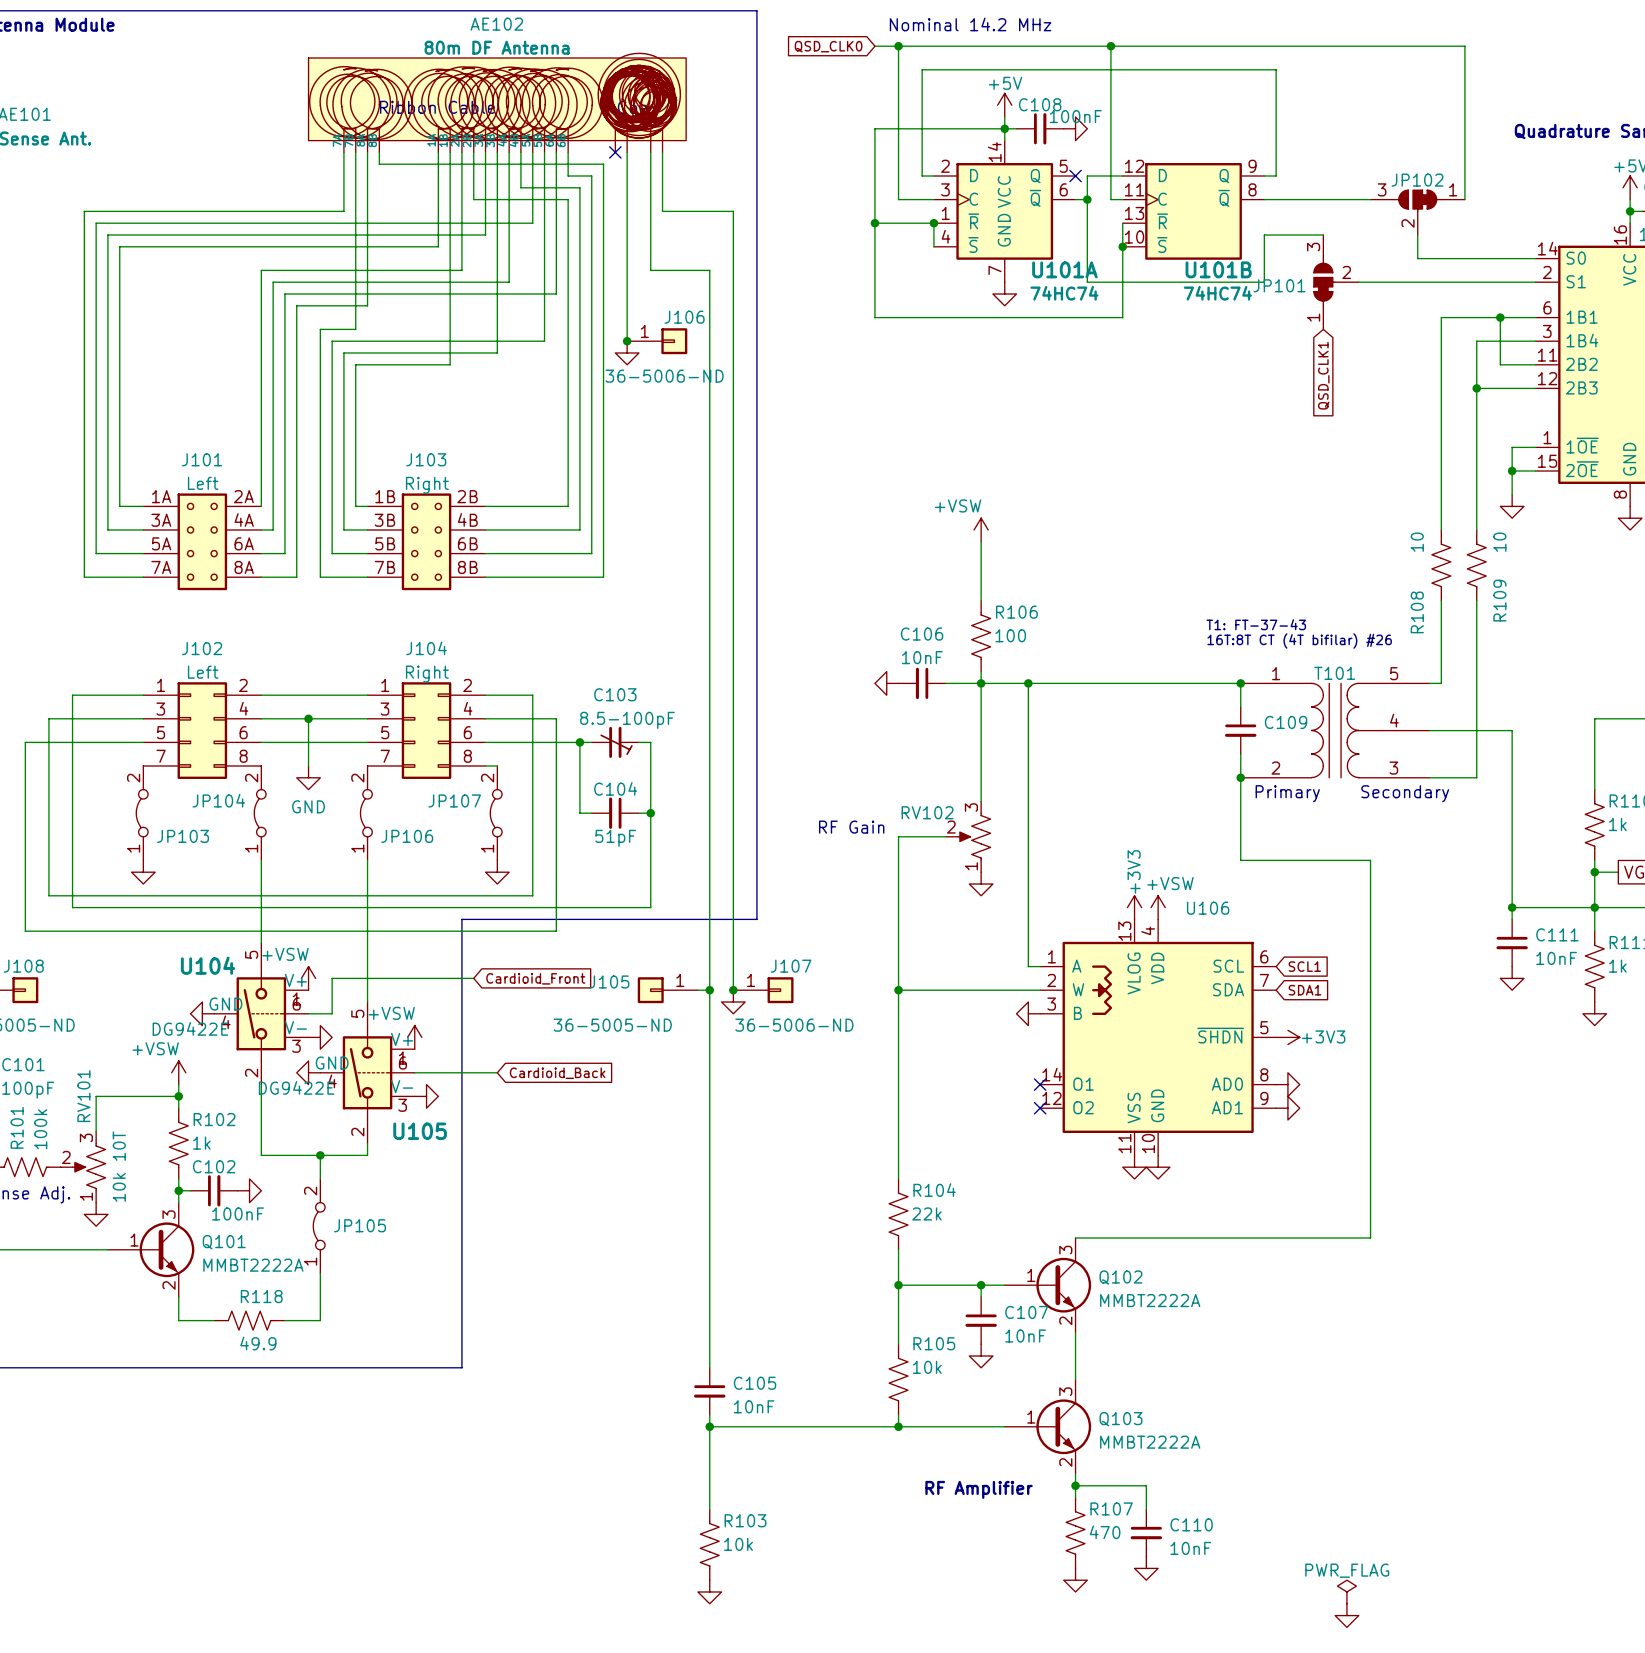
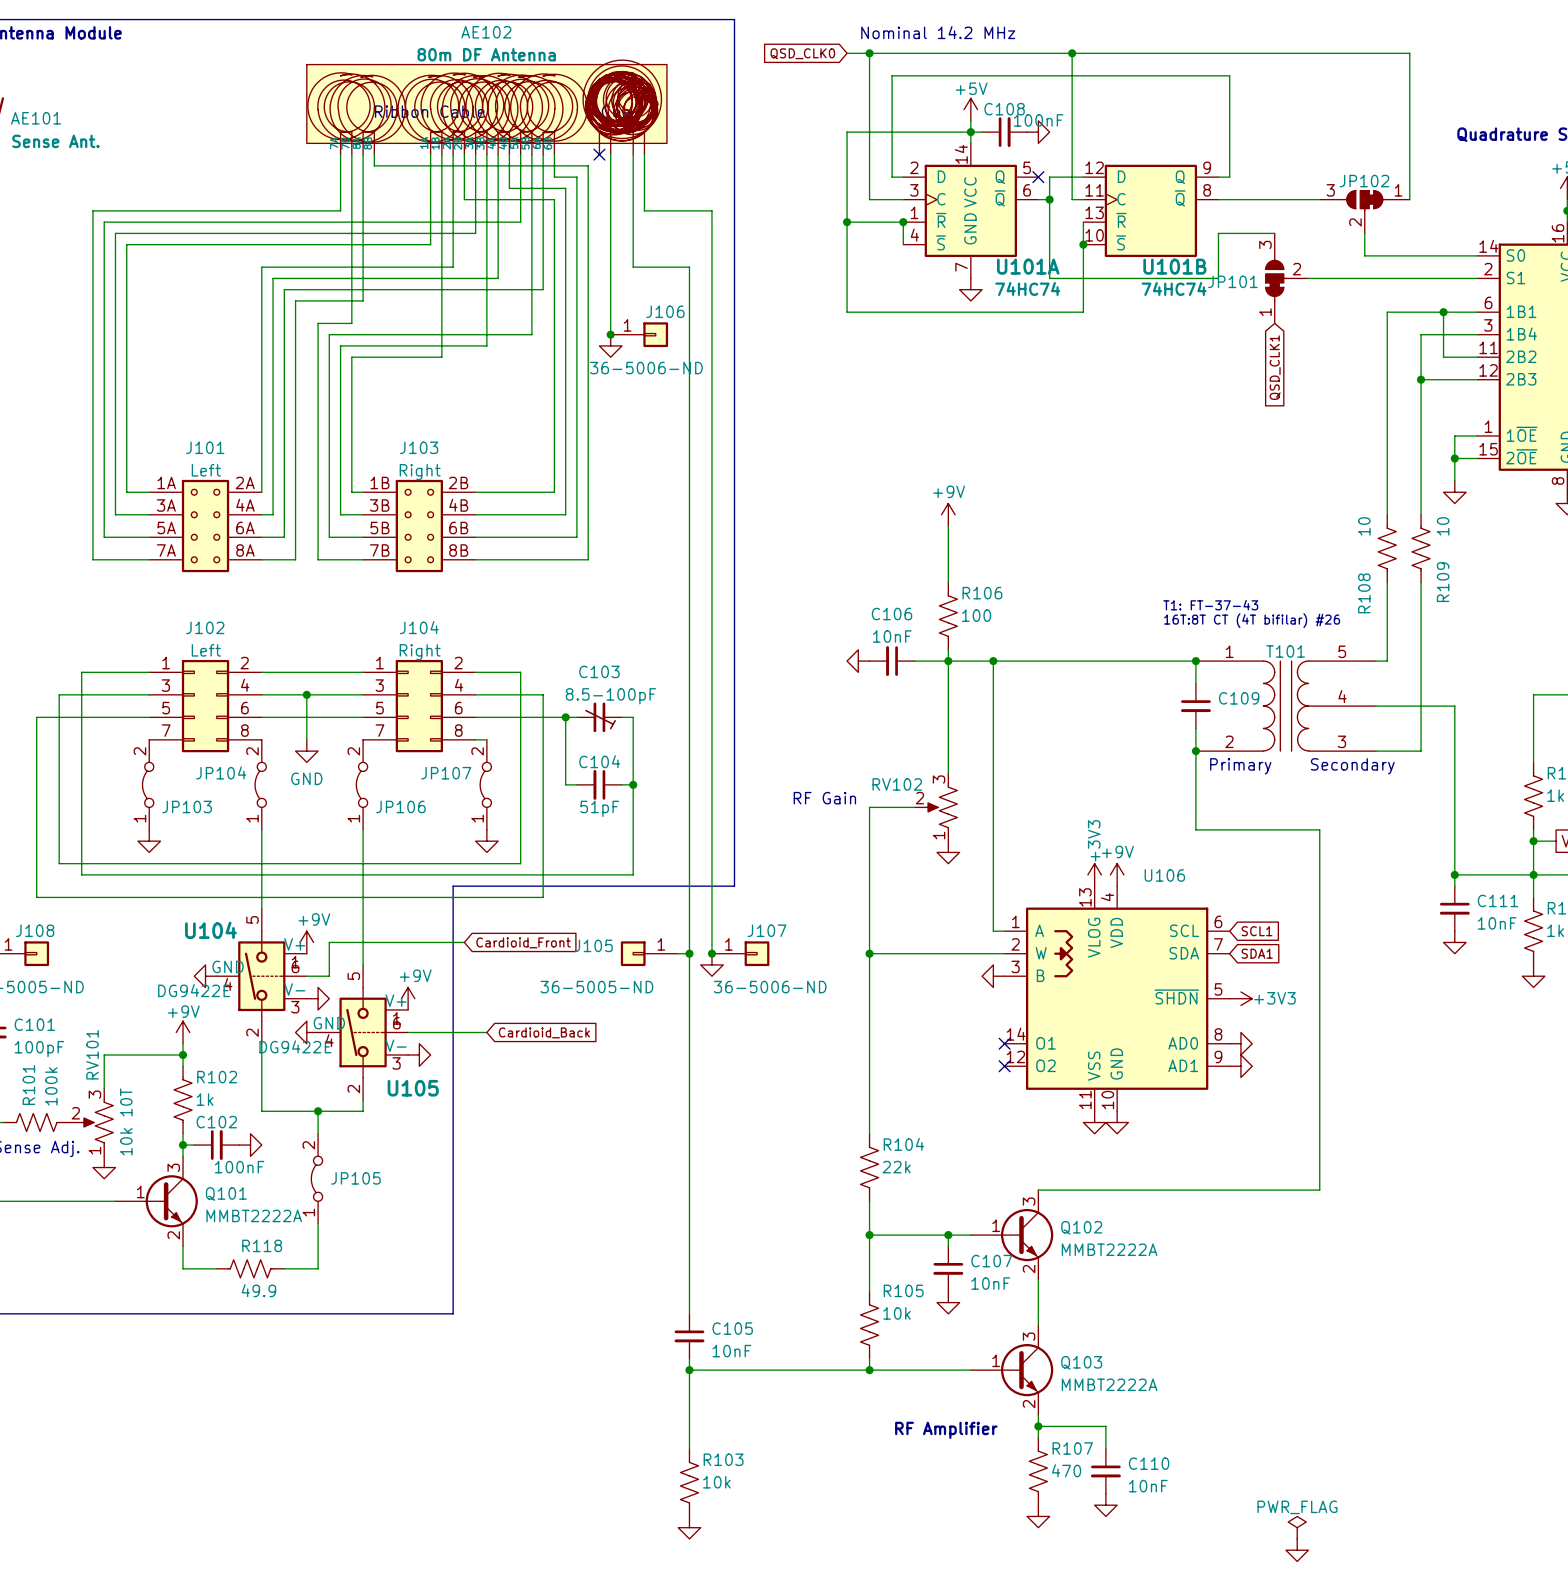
power symbol: +VSW (981, 530) -> +9V (948, 514)
power symbol: +VSW (1158, 907) -> +9V (1117, 874)
power symbol: +VSW (308, 978) -> +9V (306, 942)
power symbol: +VSW (414, 1037) -> +9V (408, 998)
power symbol: +VSW (178, 1072) -> +9V (183, 1032)

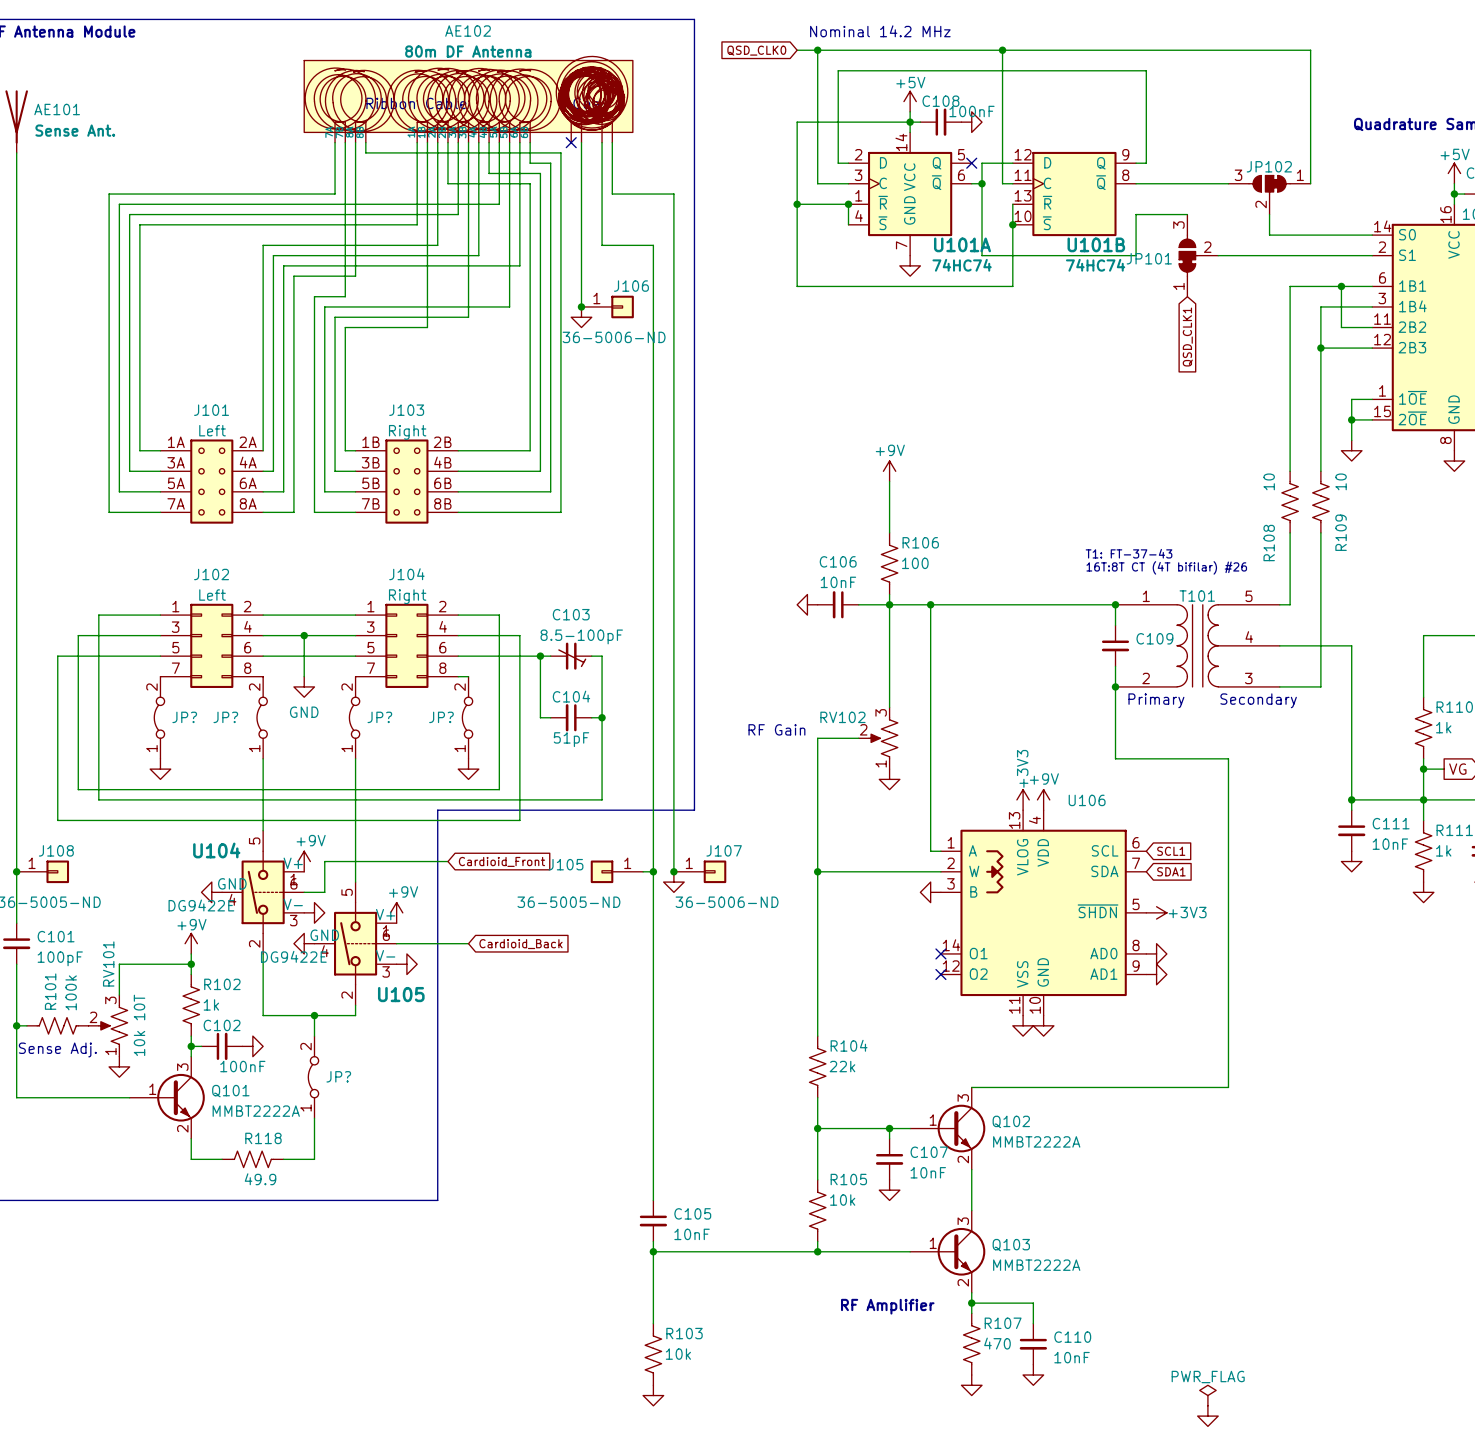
JP104 name: JP104 (221, 772) -> JP? (225, 717)
JP107 name: JP107 (446, 773) -> JP? (441, 717)
JP103 name: JP103 (187, 806) -> JP? (184, 717)
JP106 name: JP106 (400, 806) -> JP? (379, 717)
JP105 name: JP105 (355, 1178) -> JP? (338, 1076)

